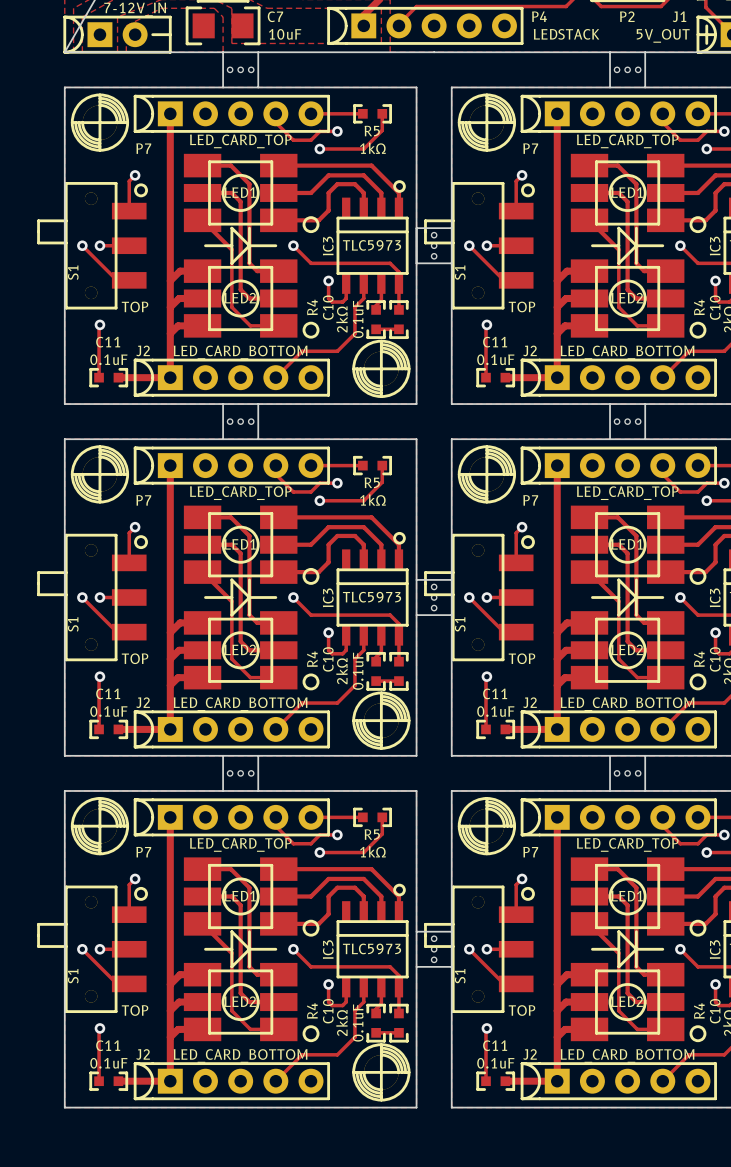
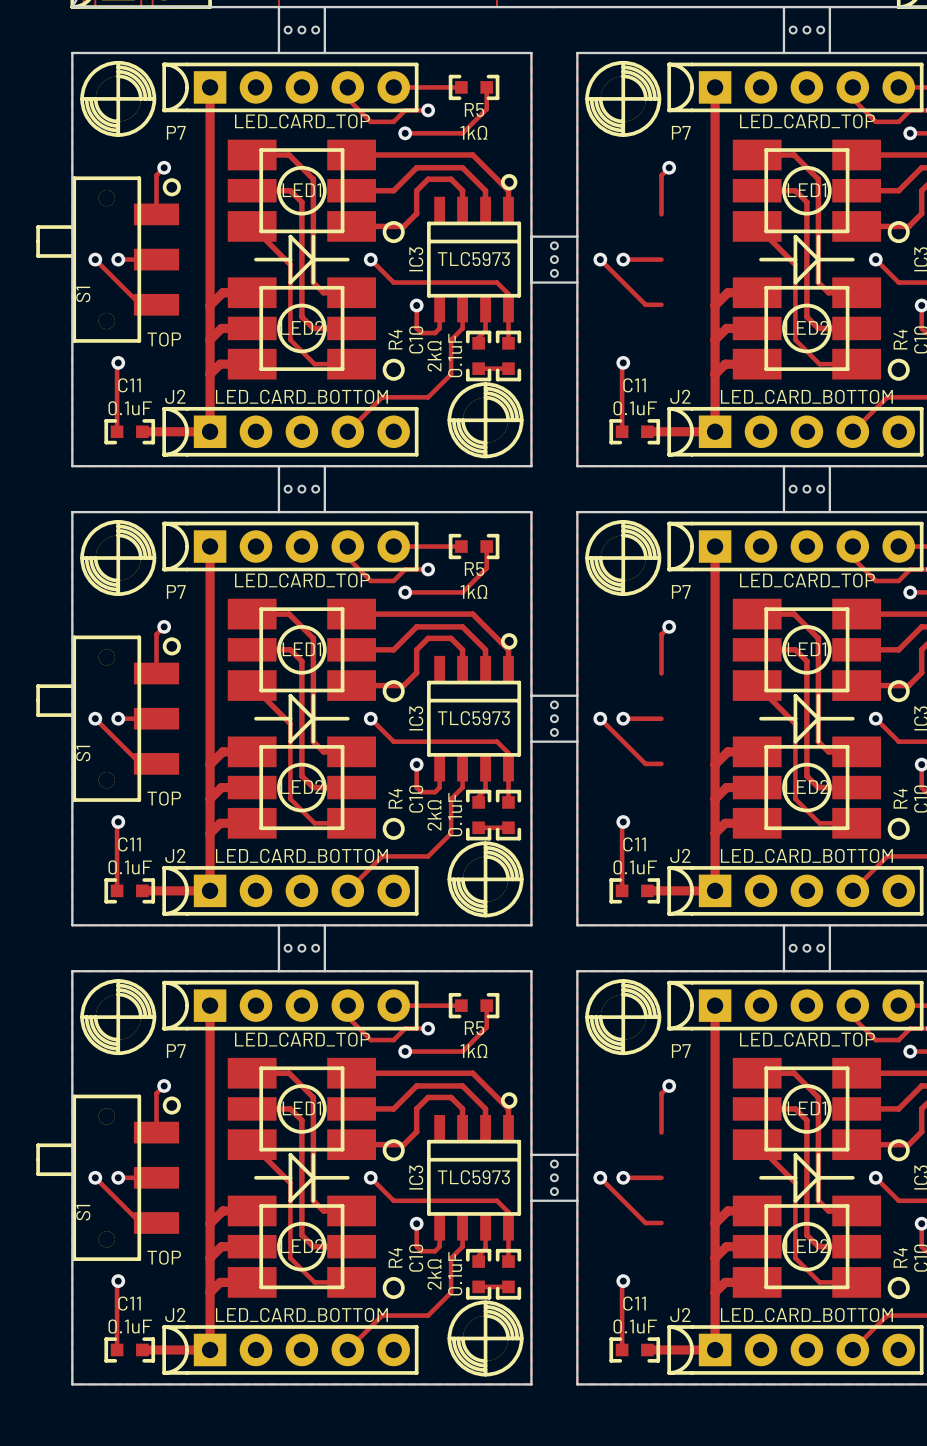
S1: TOP (479, 245) -> none
S1: TOP (479, 597) -> none
S1: TOP (479, 949) -> none

